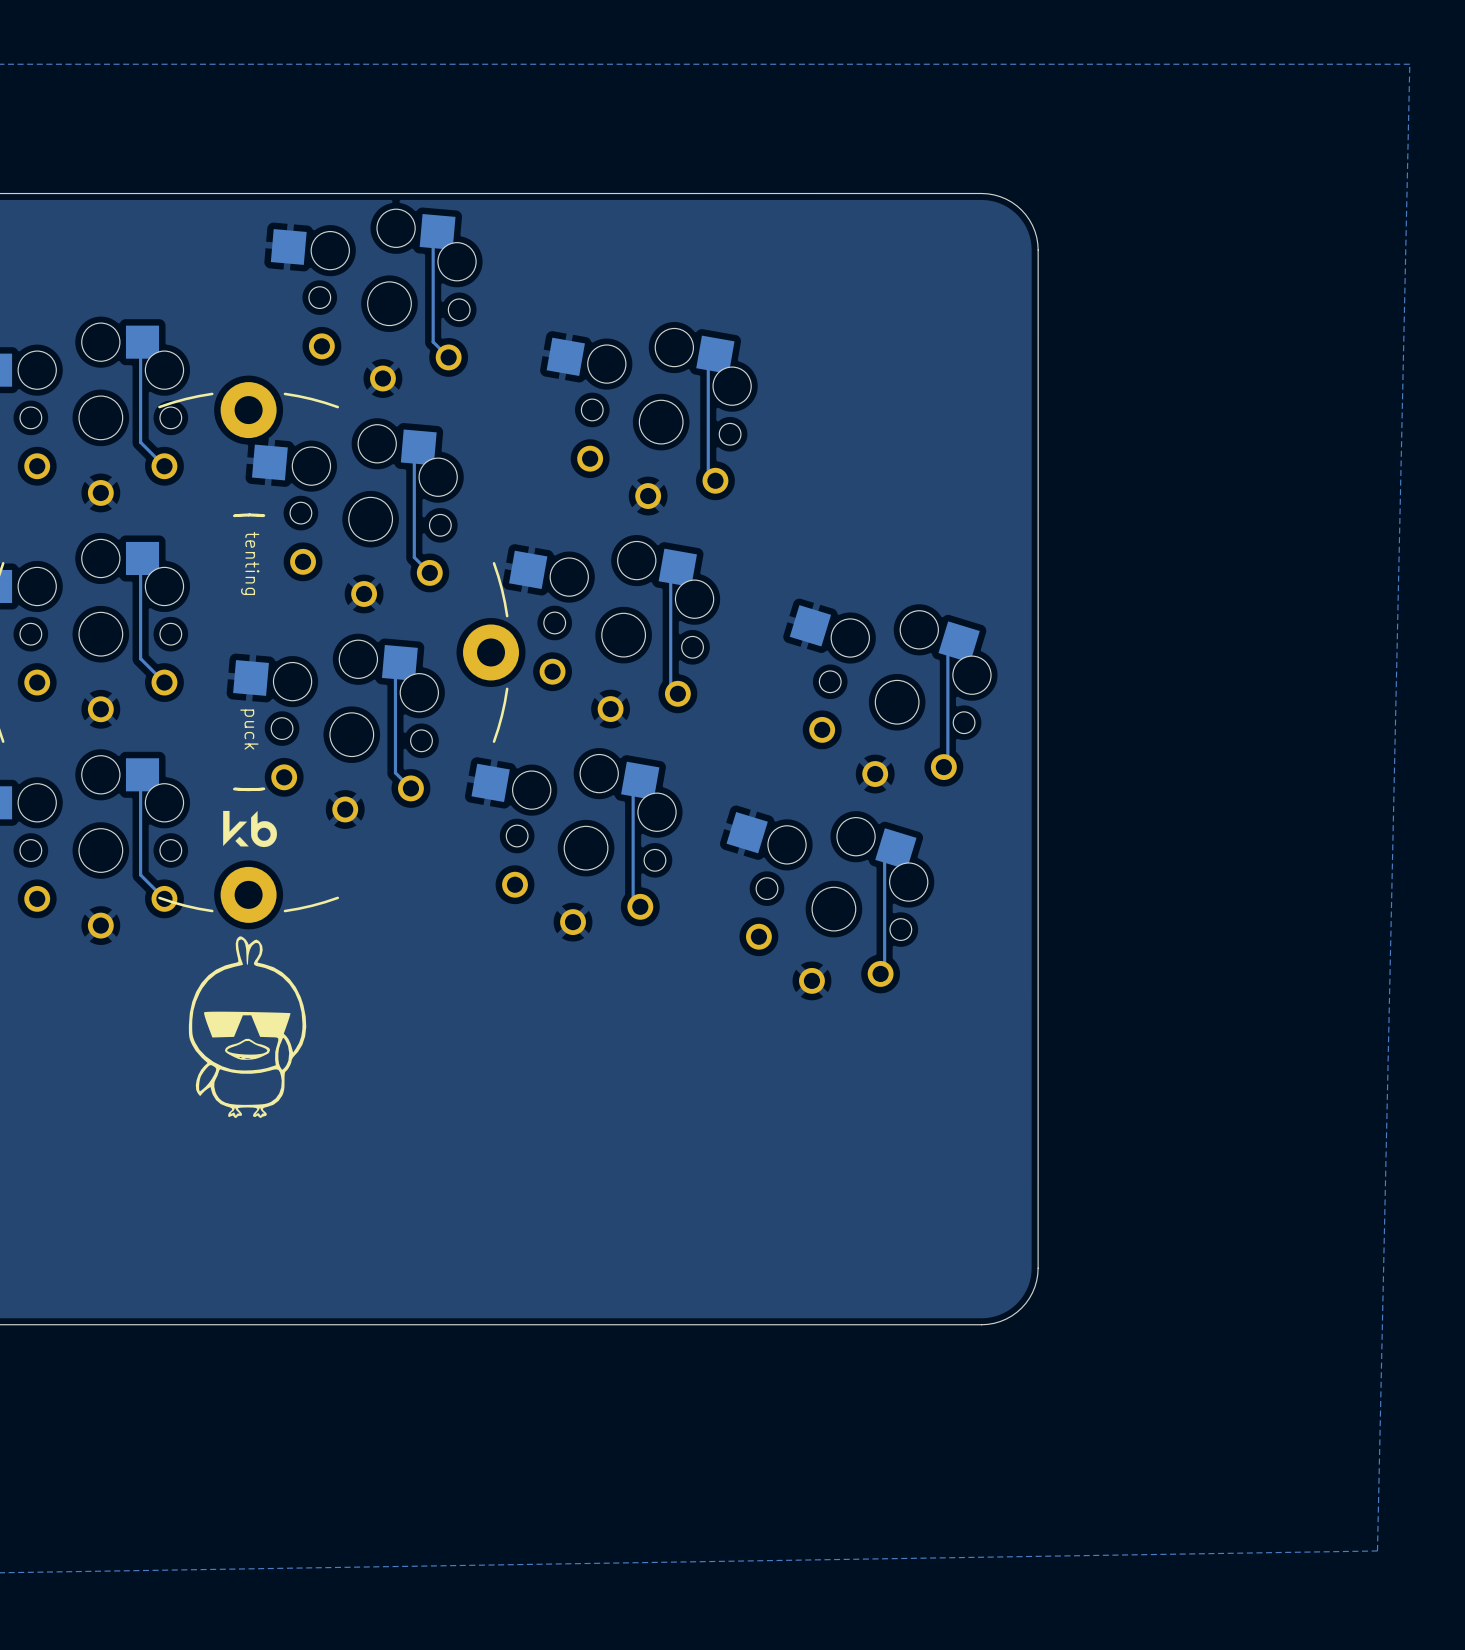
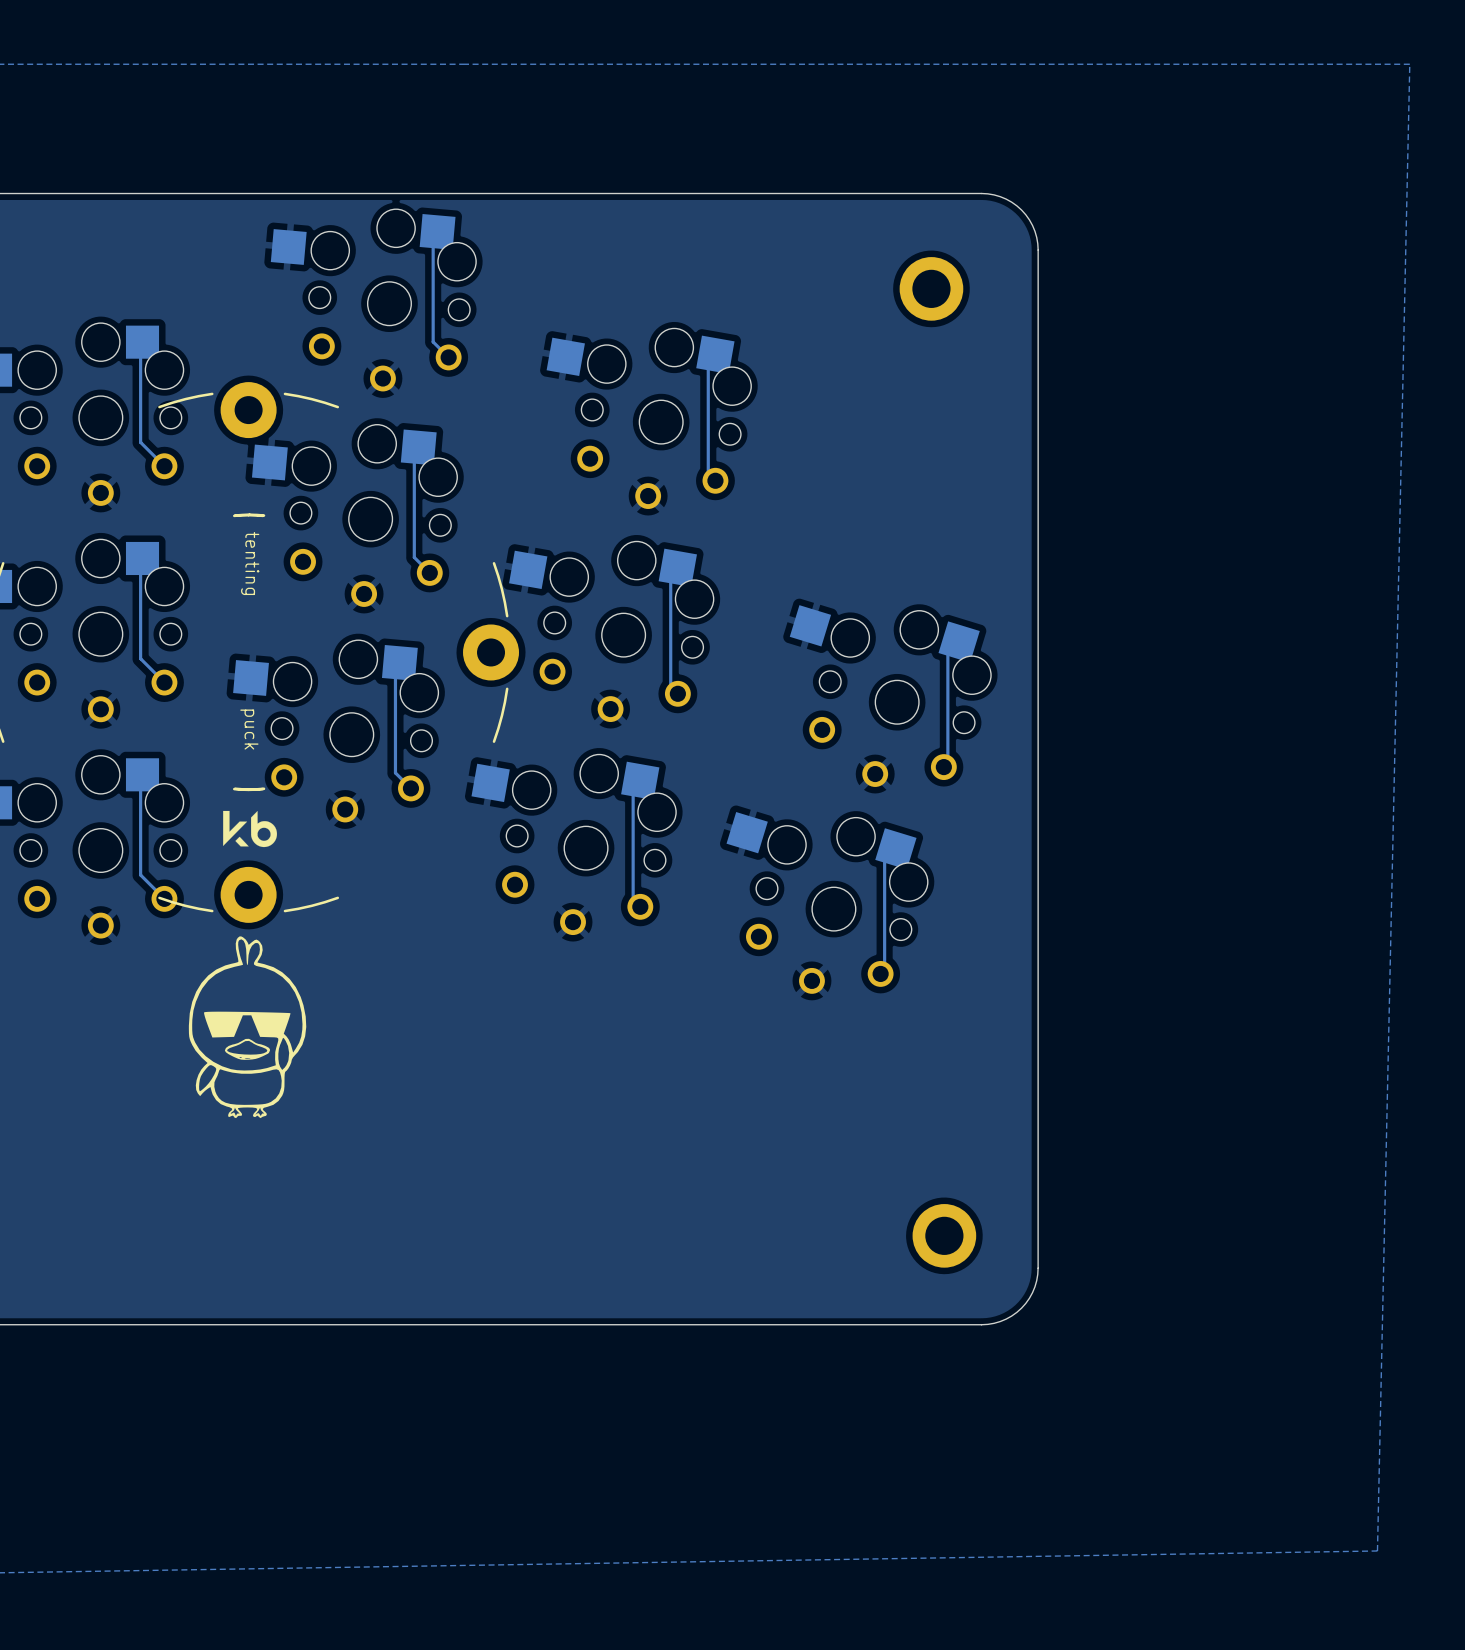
part: none -> (931, 288)
part: none -> (944, 1235)

